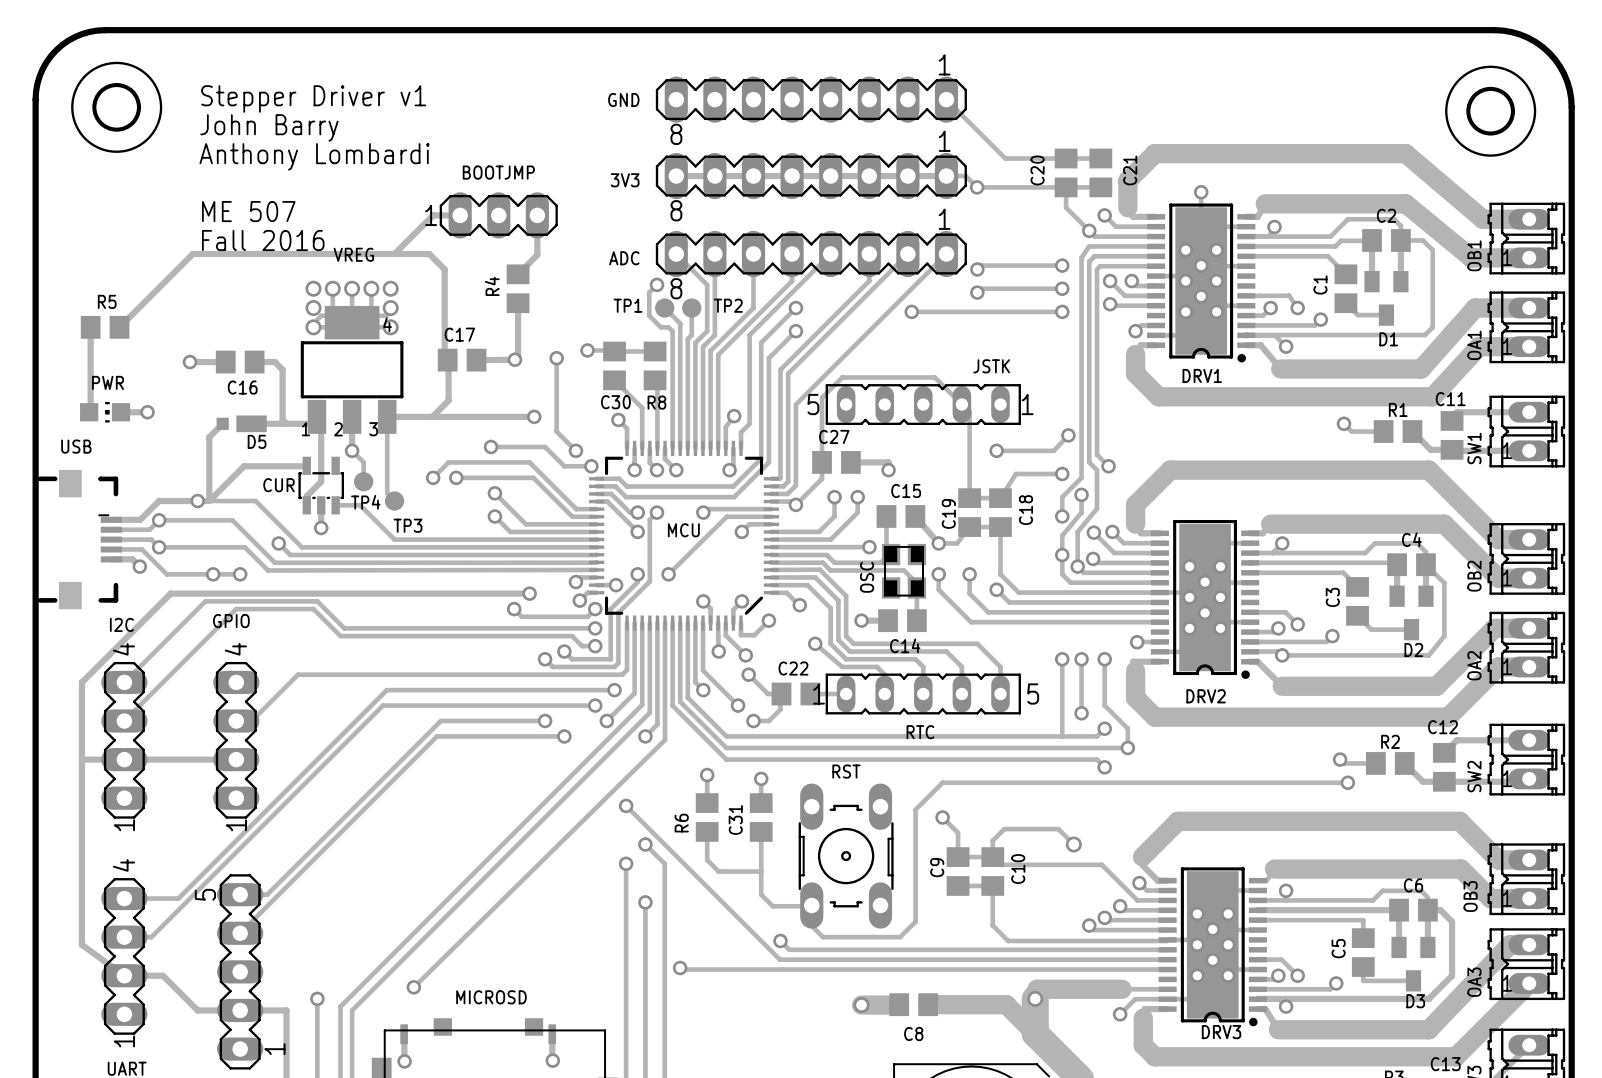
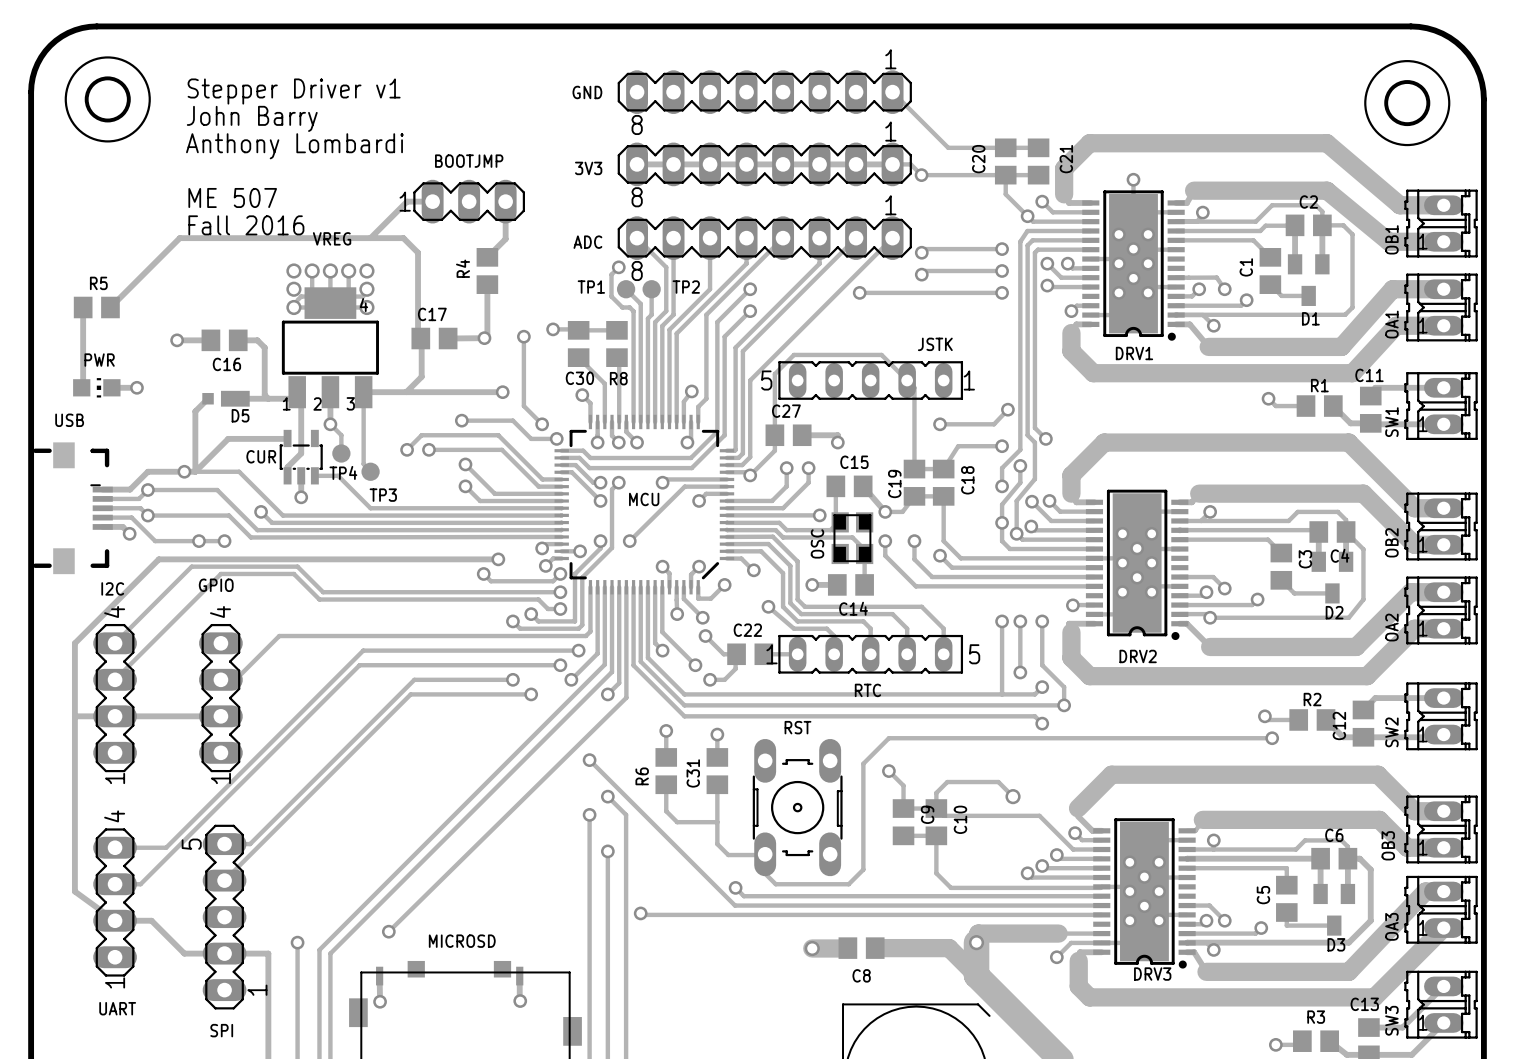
C4 name position: C4 (1411, 539) -> C4 (1340, 555)
C3 name position: C3 (1332, 597) -> C3 (1305, 559)
C12 name rotation: 0° (1442, 727) -> 90° counterclockwise (1339, 725)
C12 name position: C12 (1442, 727) -> C12 (1339, 725)
C9 name position: C9 (937, 867) -> C9 (927, 814)

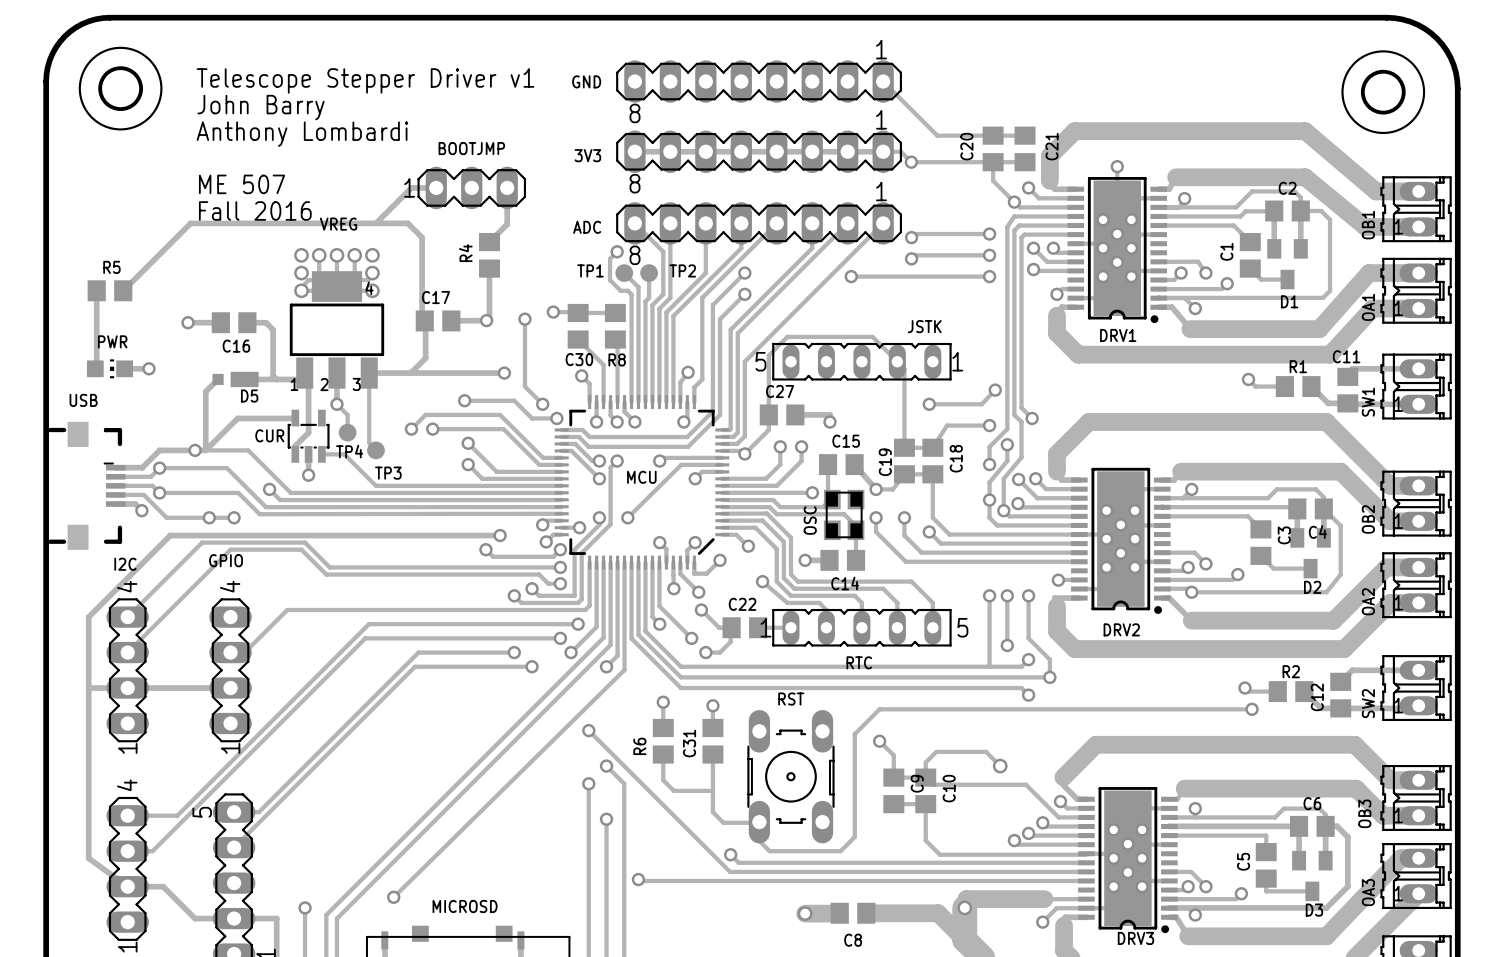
text: Stepper Driver v1 (294, 91) -> Telescope Stepper Driver v1 (365, 80)

